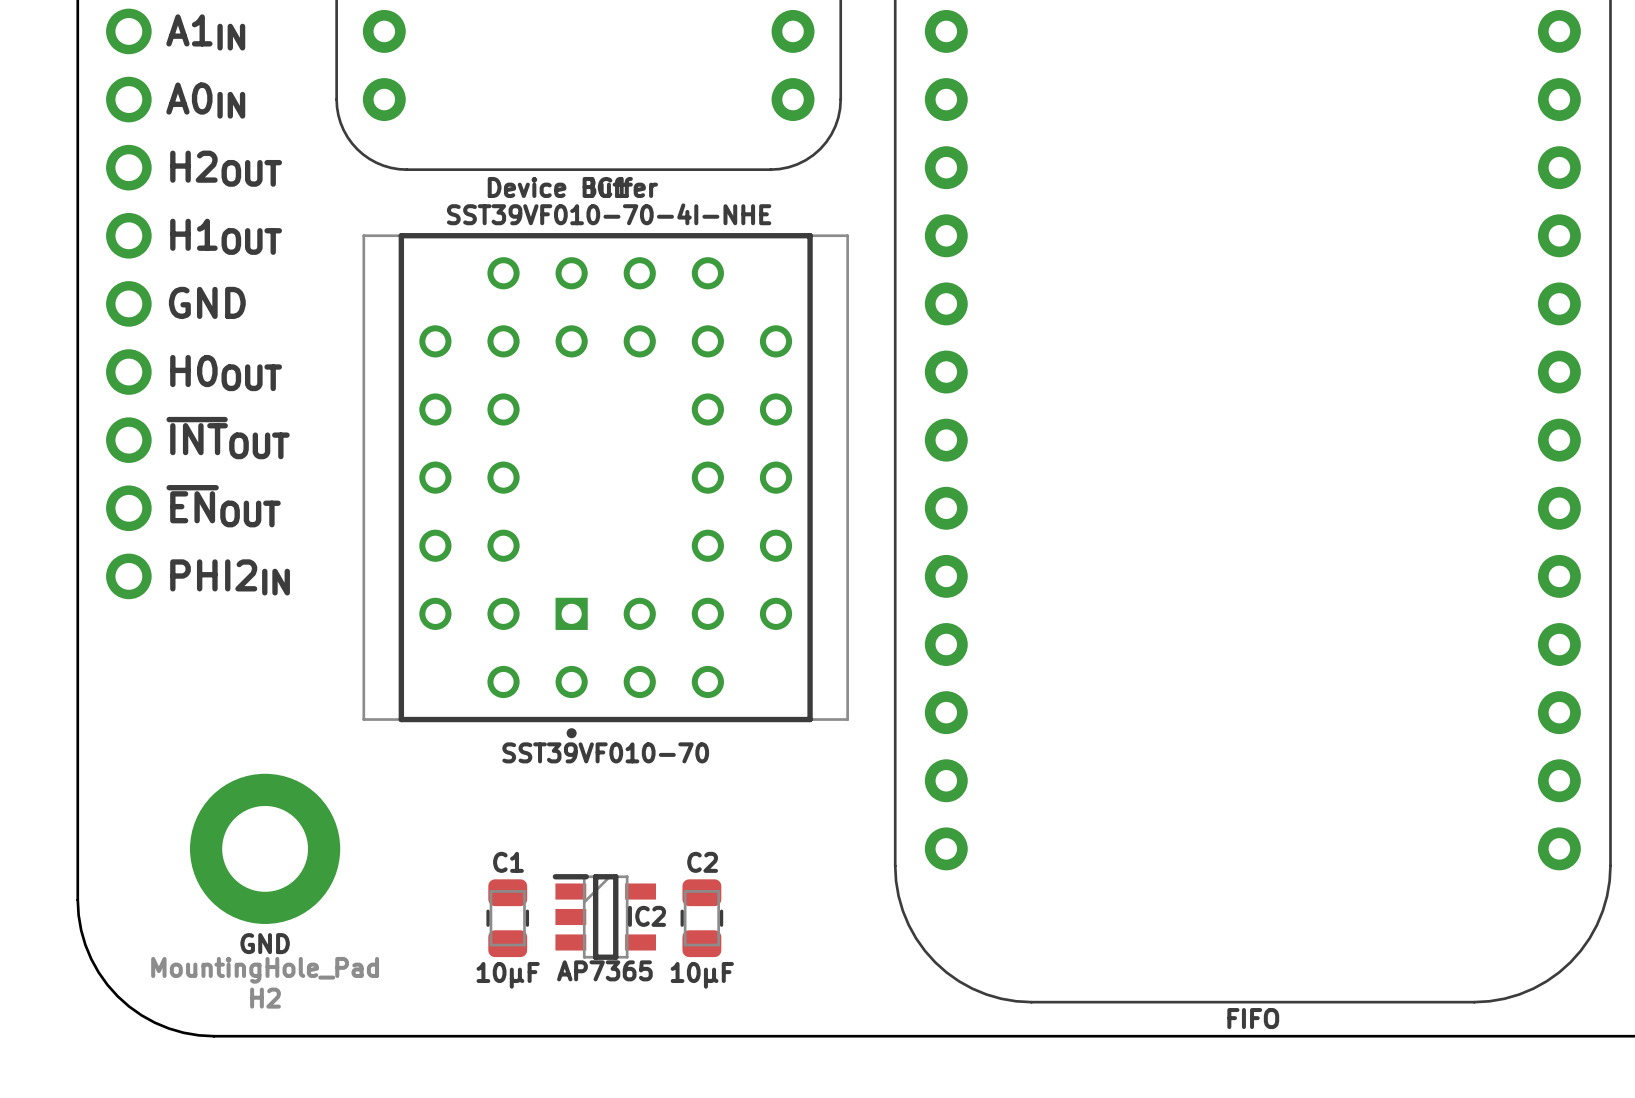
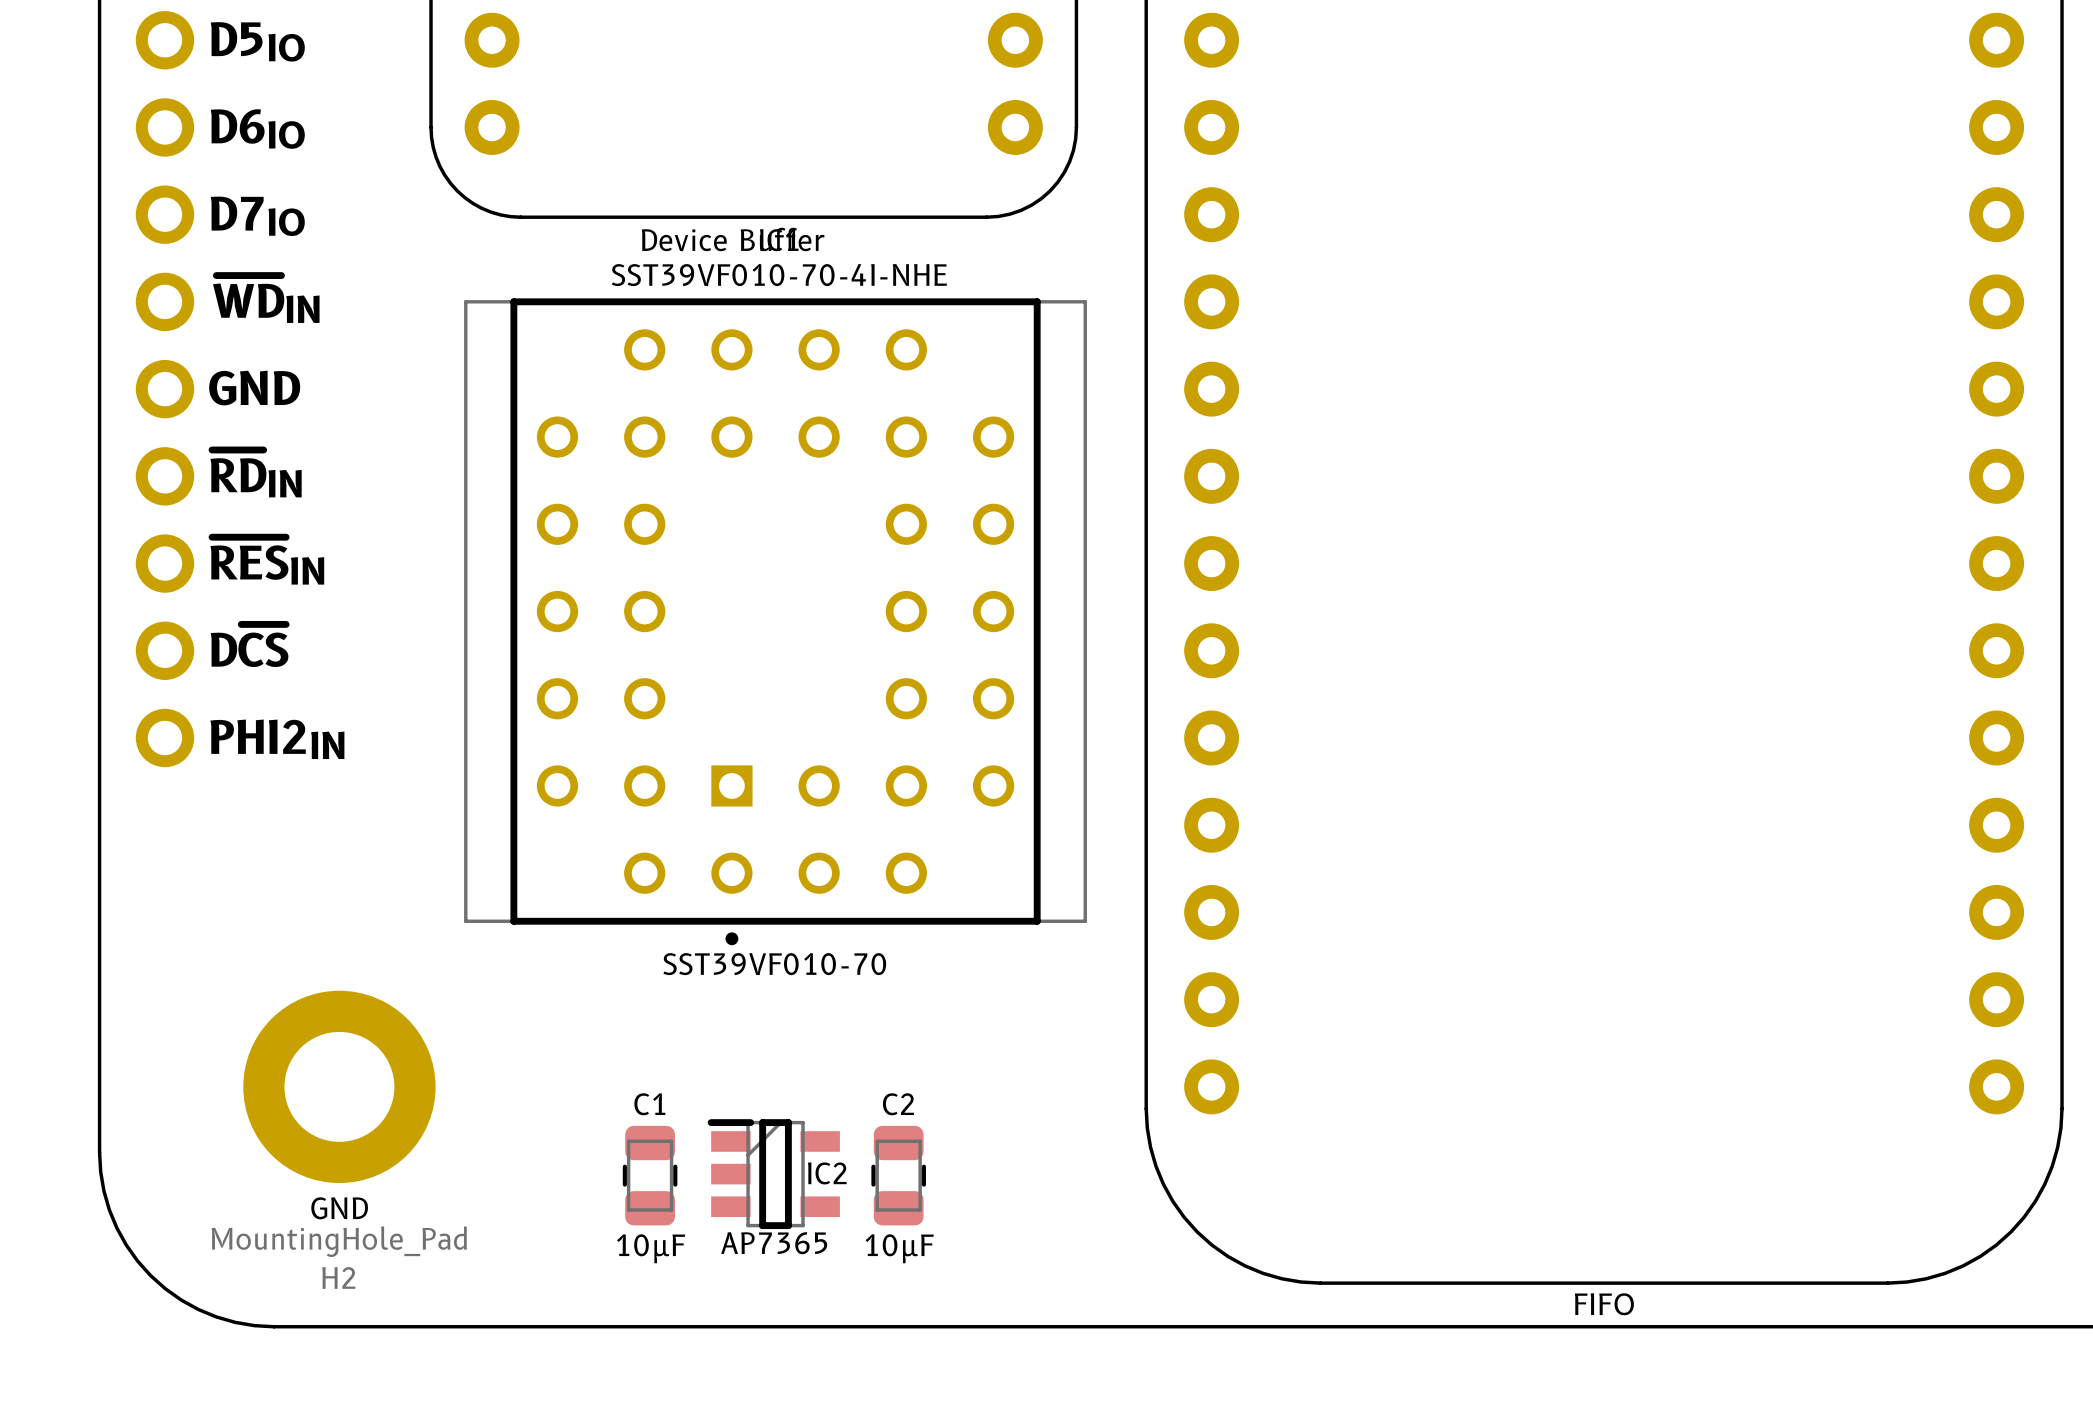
text: A1IN (205, 32) -> D5IO (257, 41)
text: A0IN (205, 100) -> D6IO (257, 129)
text: H2OUT (226, 168) -> D7IO (257, 216)
text: H1OUT (226, 236) -> ~{WD}IN (266, 299)
text: H0OUT (226, 373) -> ~{RD}IN (256, 473)
text: ~{INT}OUT (228, 438) -> ~{RES}IN (267, 560)
text: ~{EN}OUT (223, 506) -> D~{CS} (249, 645)

